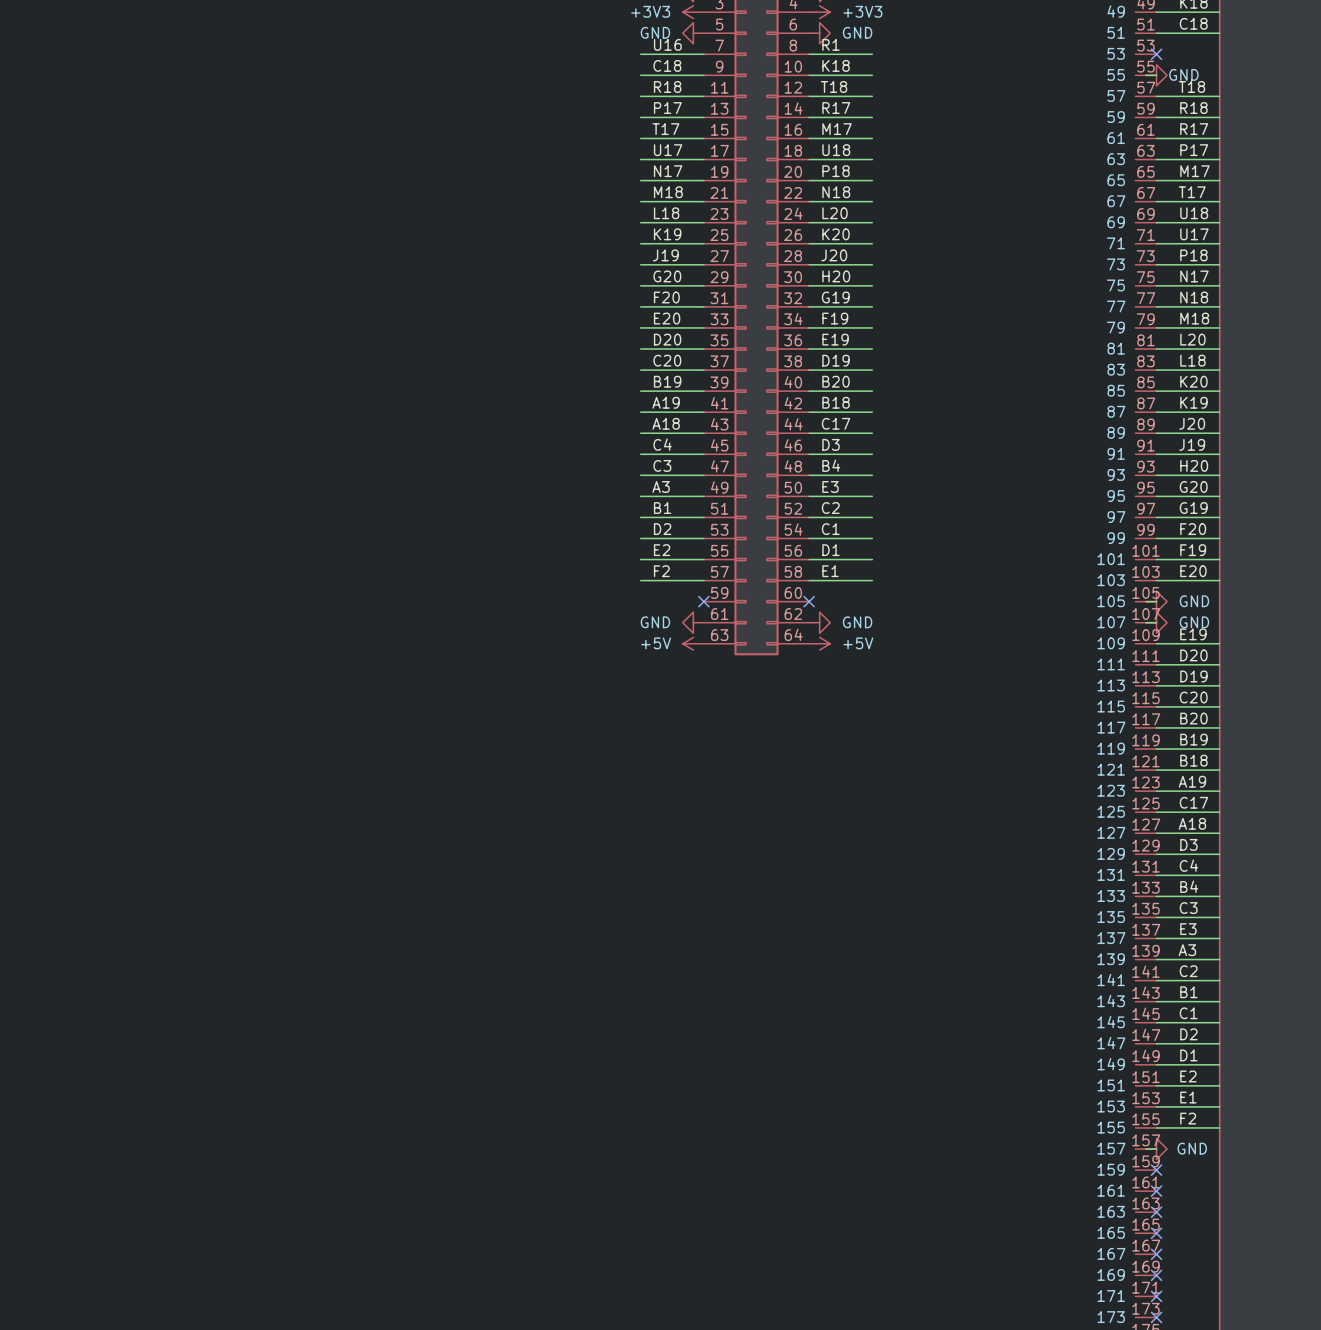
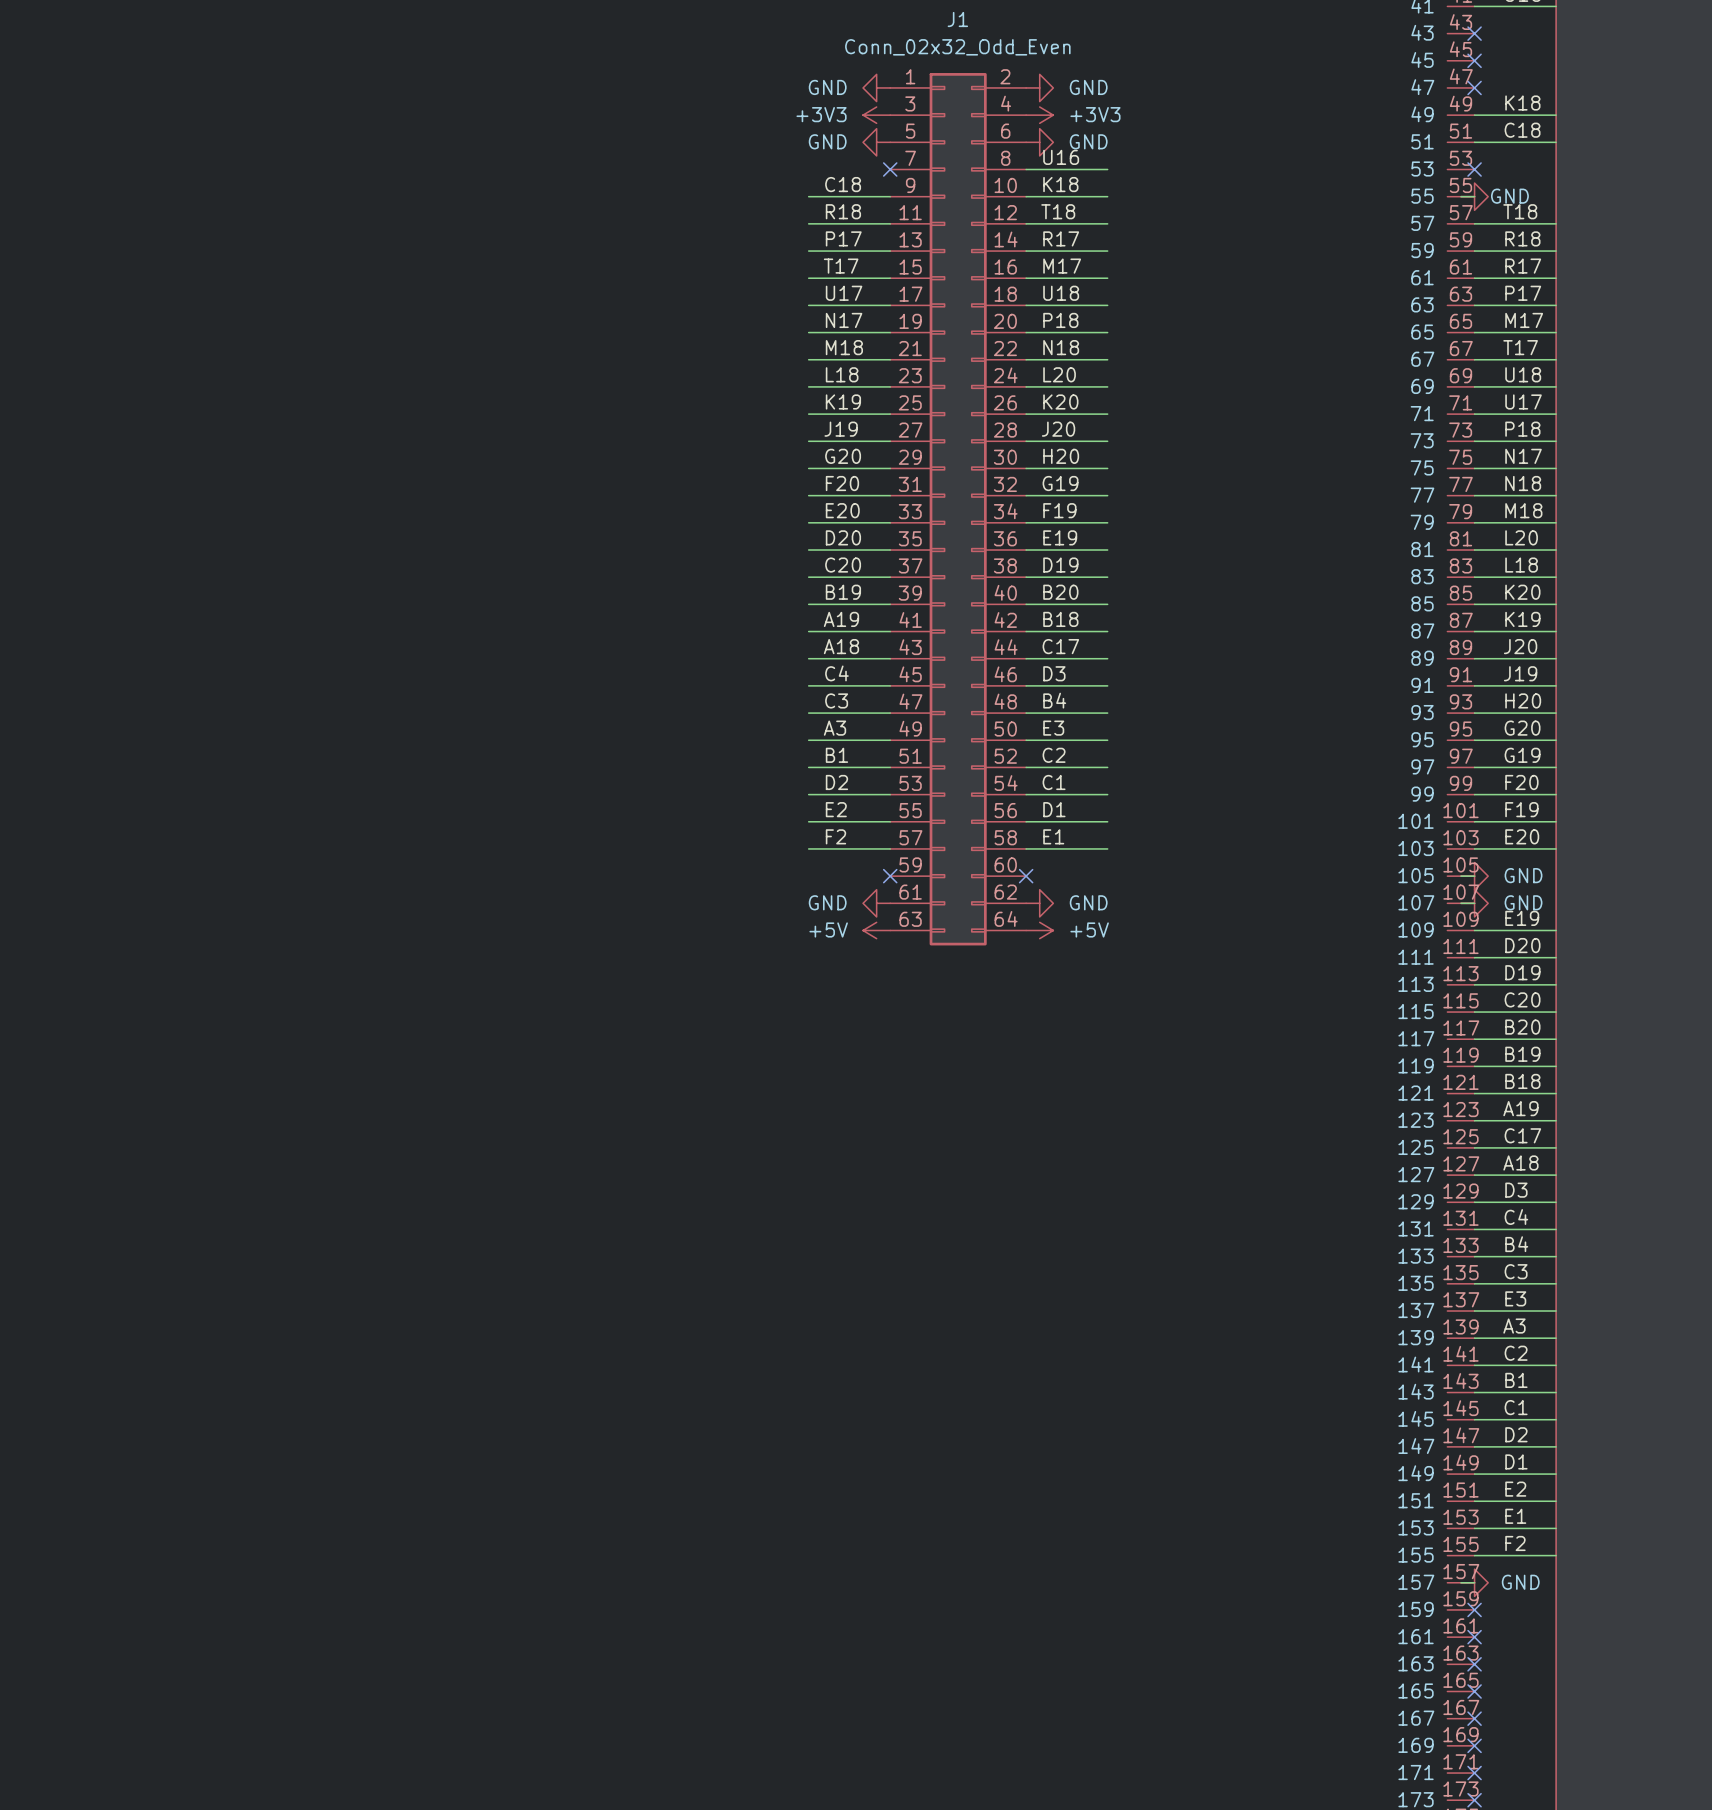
label: U16 (667, 44) -> none
label: R1 (831, 44) -> U16 (1061, 157)
wire: (640, 54) (703, 54) -> none
no-connect mark: none -> (890, 169)

